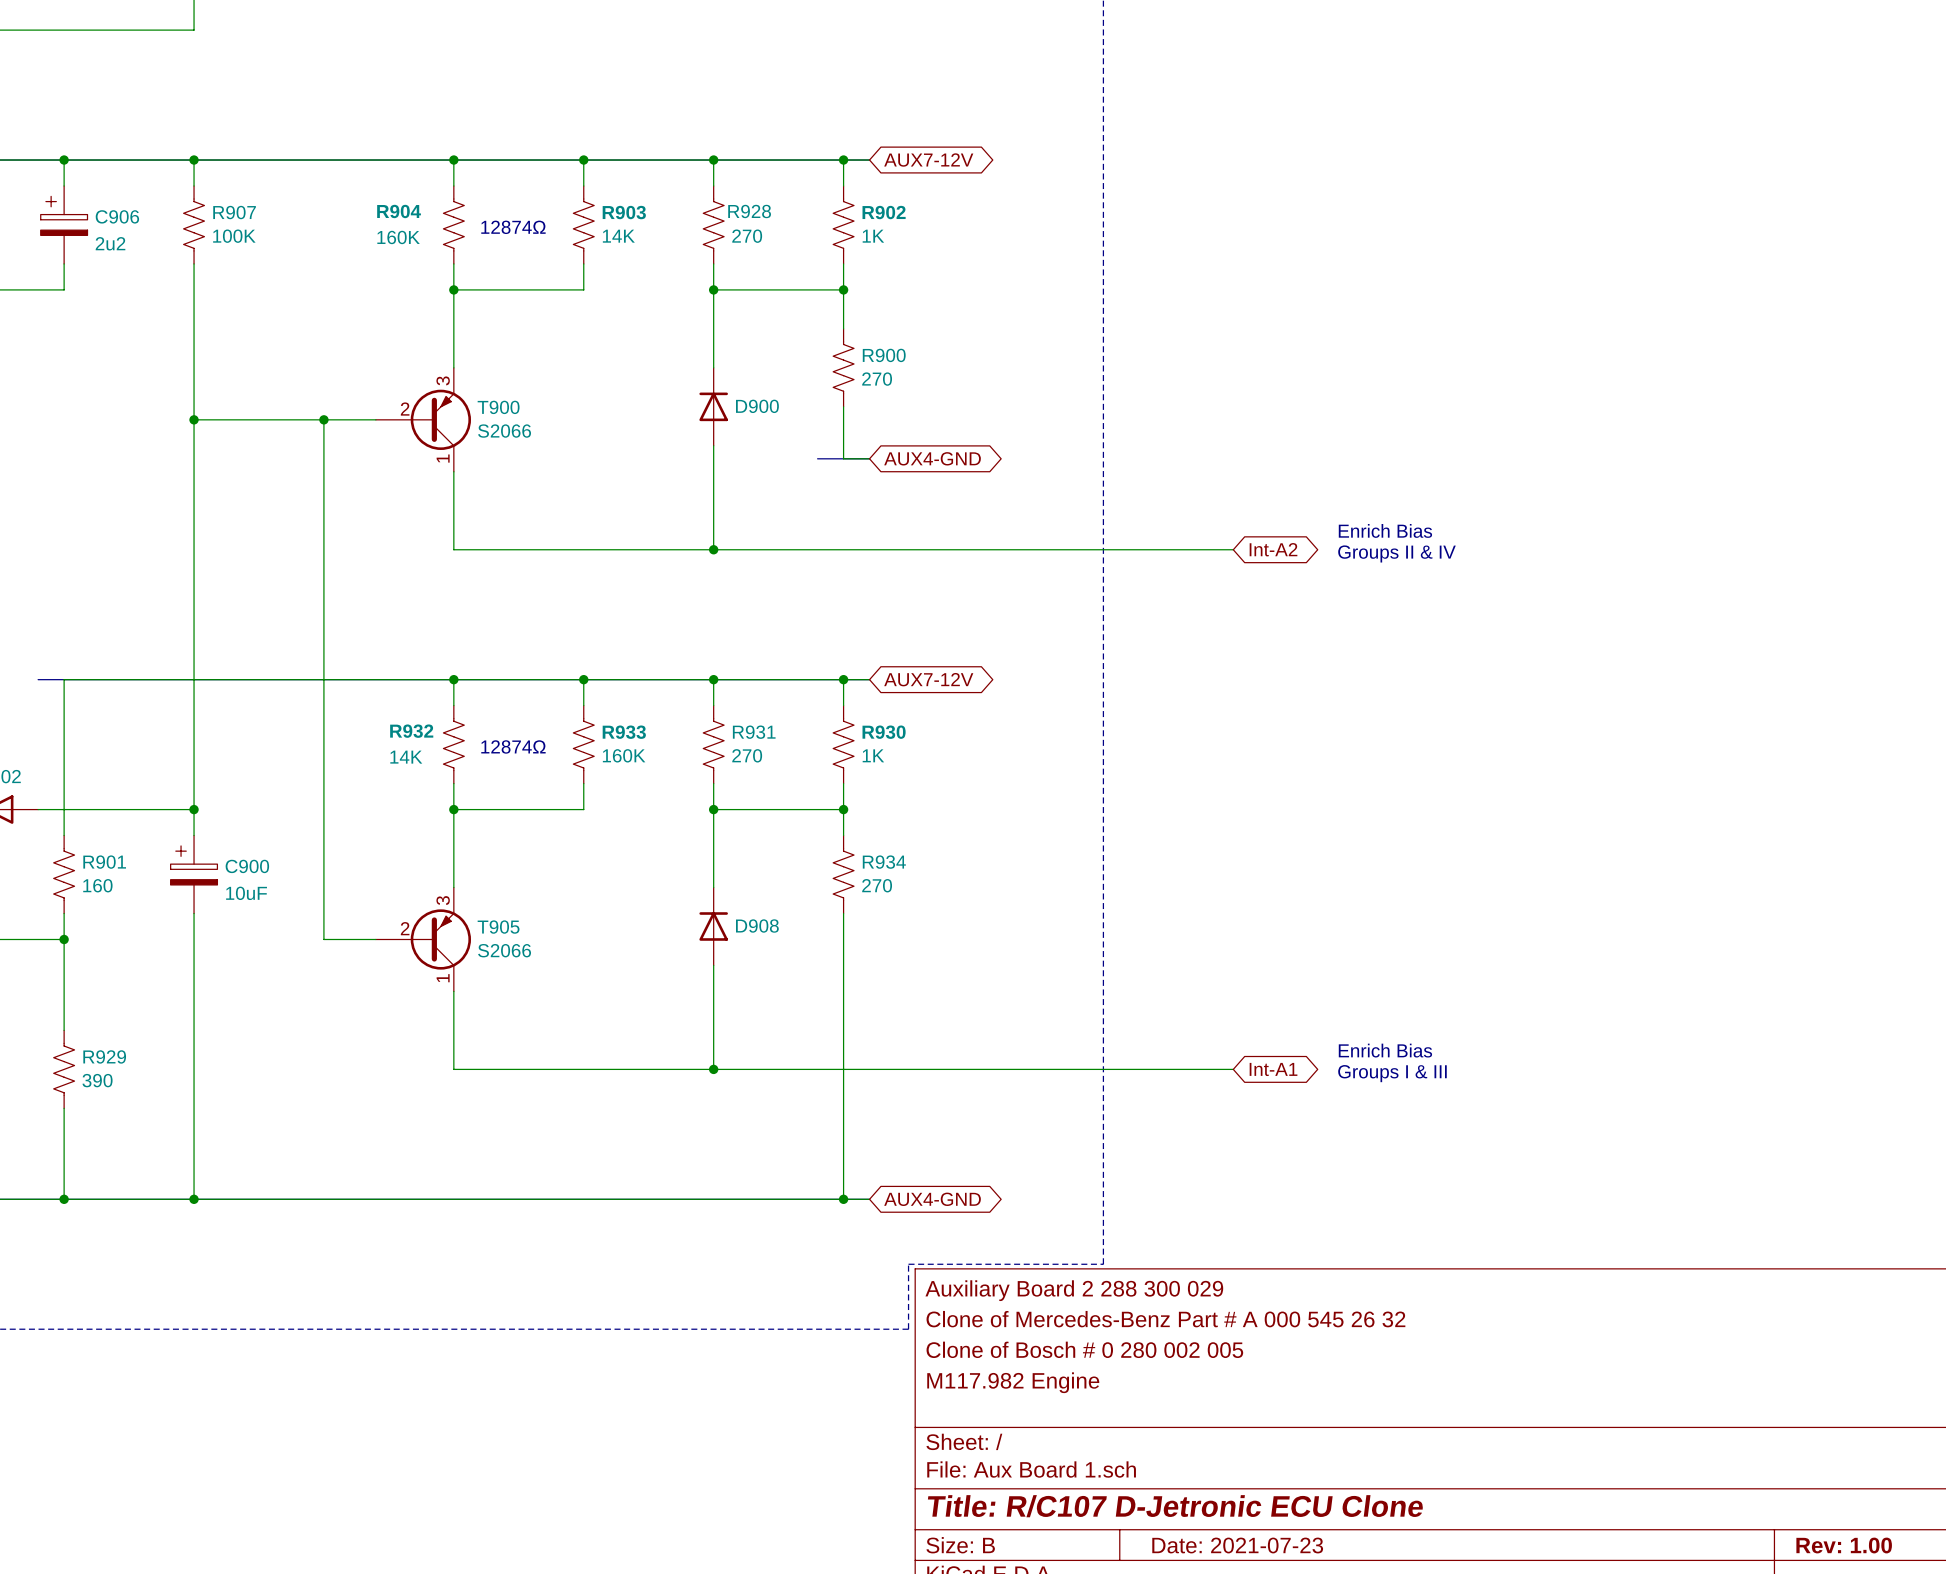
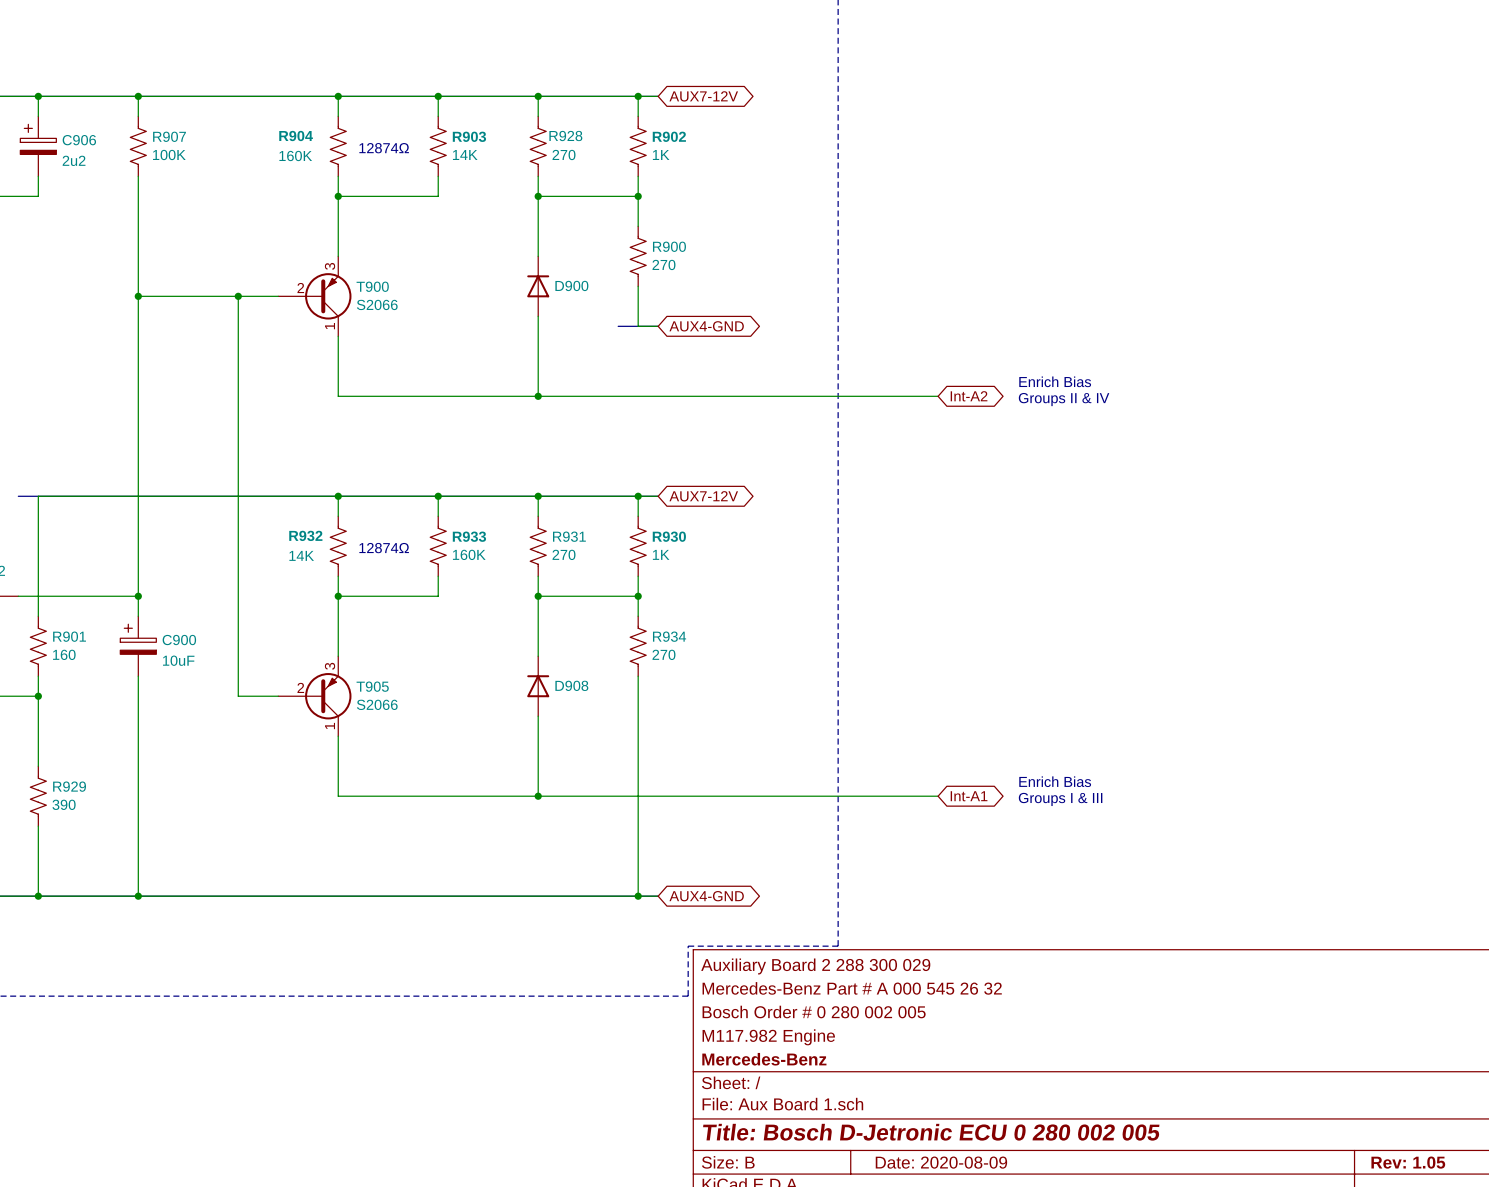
title block: Clone of Mercedes-Benz Part # A 000 545 26 32 (1165, 1319) -> Mercedes-Benz Part # A 000 545 26 32 (852, 988)
title block: Clone of Bosch # 0 280 002 005 (1084, 1349) -> Bosch Order # 0 280 002 005 (814, 1012)
title block: none -> Mercedes-Benz (764, 1059)
title block: Title: R/C107 D-Jetronic ECU Clone (1175, 1506) -> Title: Bosch D-Jetronic ECU 0 280 002 005 (931, 1132)
title block: Date: 2021-07-23 (1237, 1545) -> Date: 2020-08-09 (941, 1162)
title block: Rev: 1.00 (1844, 1545) -> Rev: 1.05 (1408, 1162)

